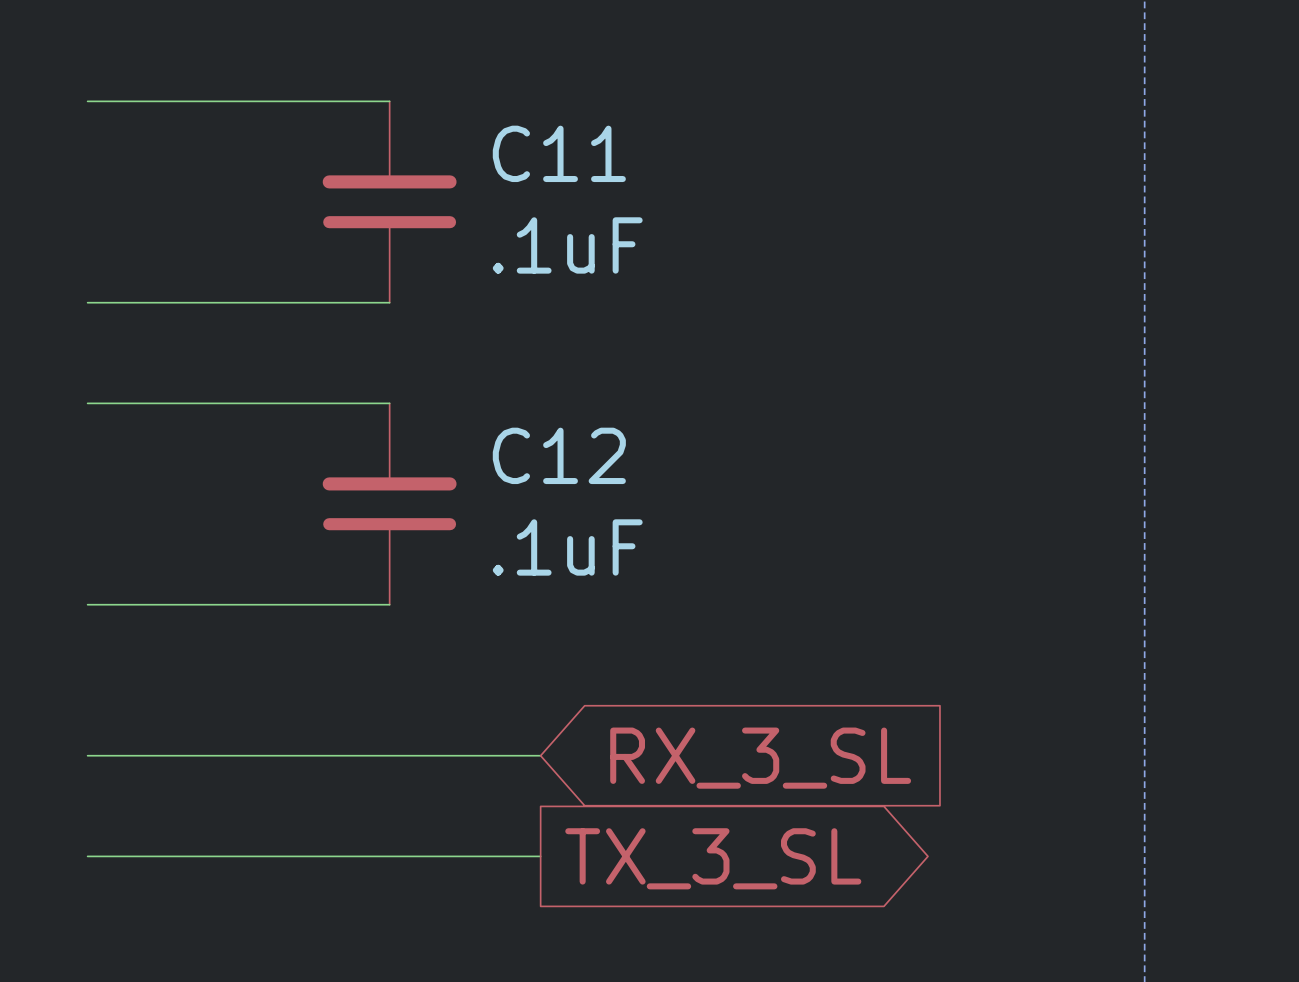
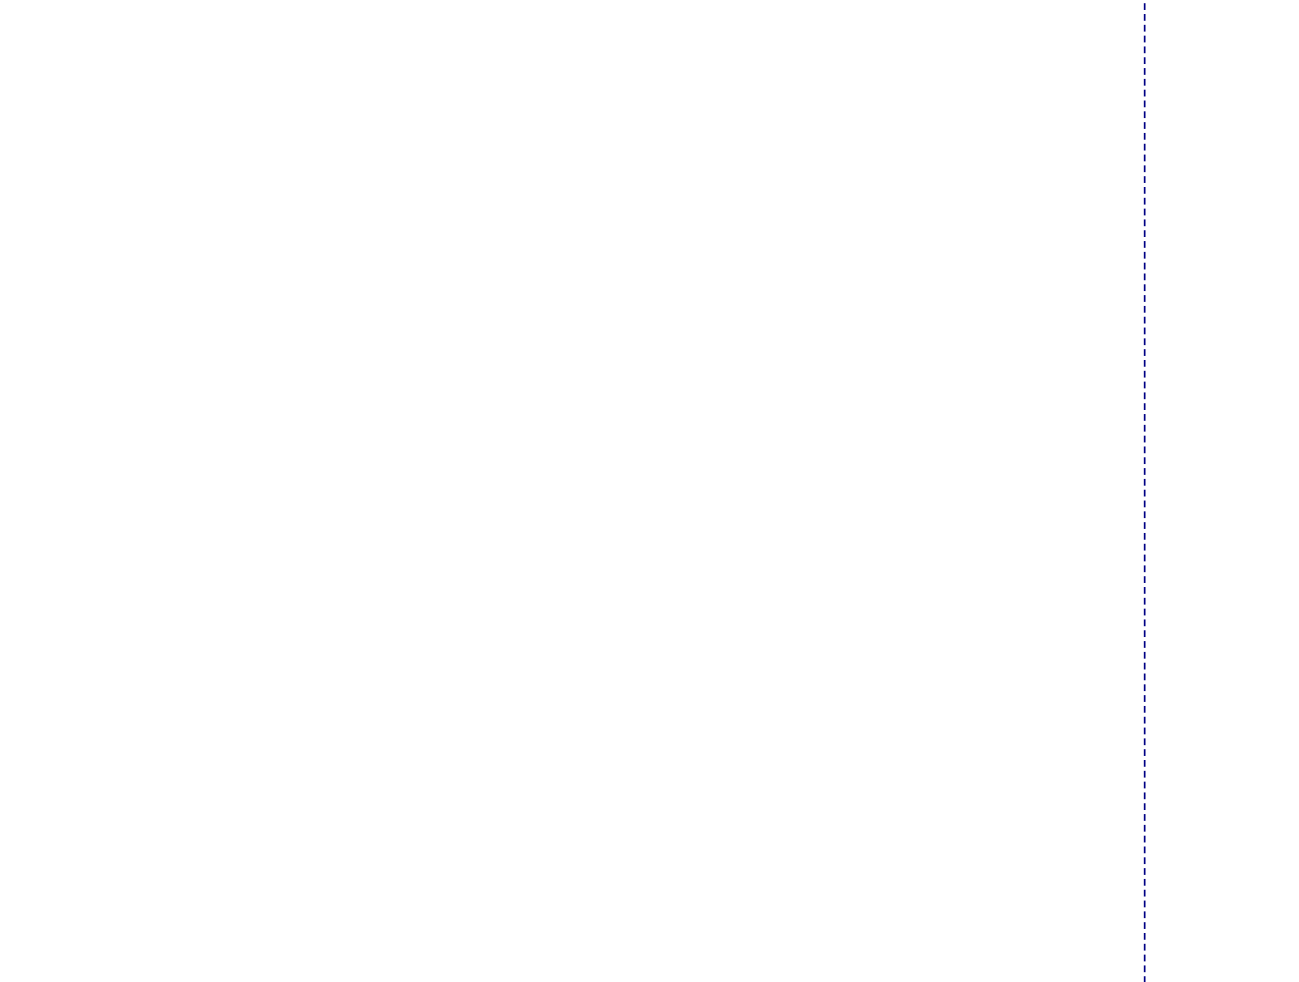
wire: (87, 101) (389, 101) -> none
C11: .1uF (389, 202) -> none
wire: (87, 302) (389, 302) -> none
wire: (87, 403) (389, 403) -> none
C12: .1uF (389, 504) -> none
wire: (87, 604) (389, 604) -> none
wire: (87, 755) (540, 755) -> none
global label: RX_3_SL (760, 758) -> none
wire: (87, 856) (540, 856) -> none
global label: TX_3_SL (713, 858) -> none

